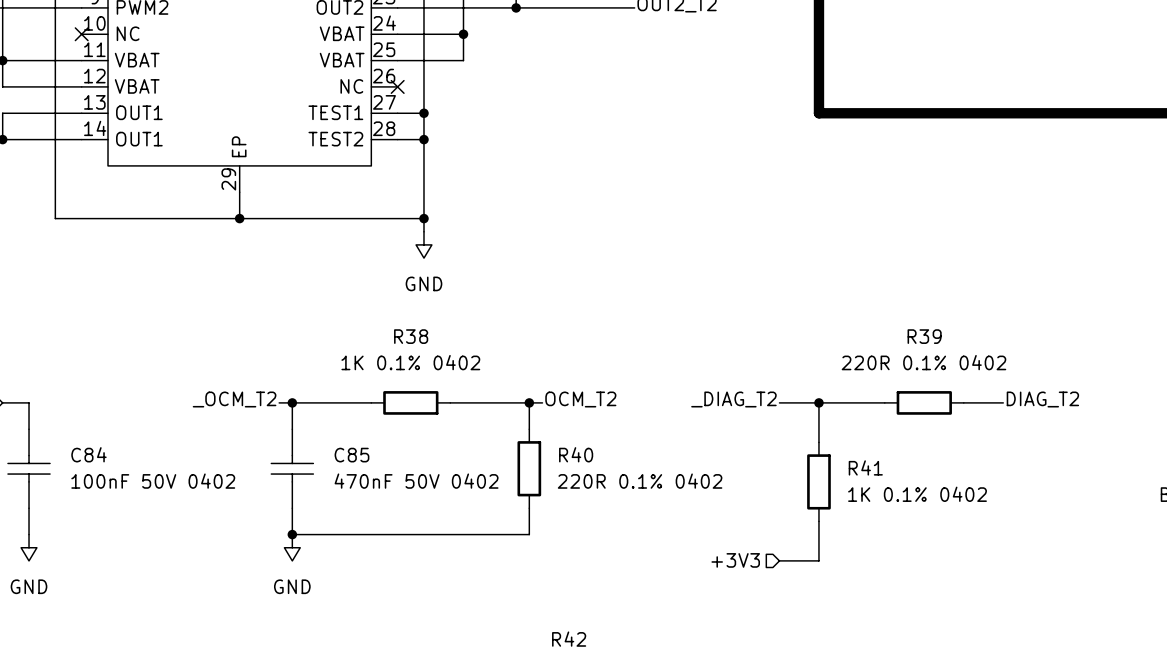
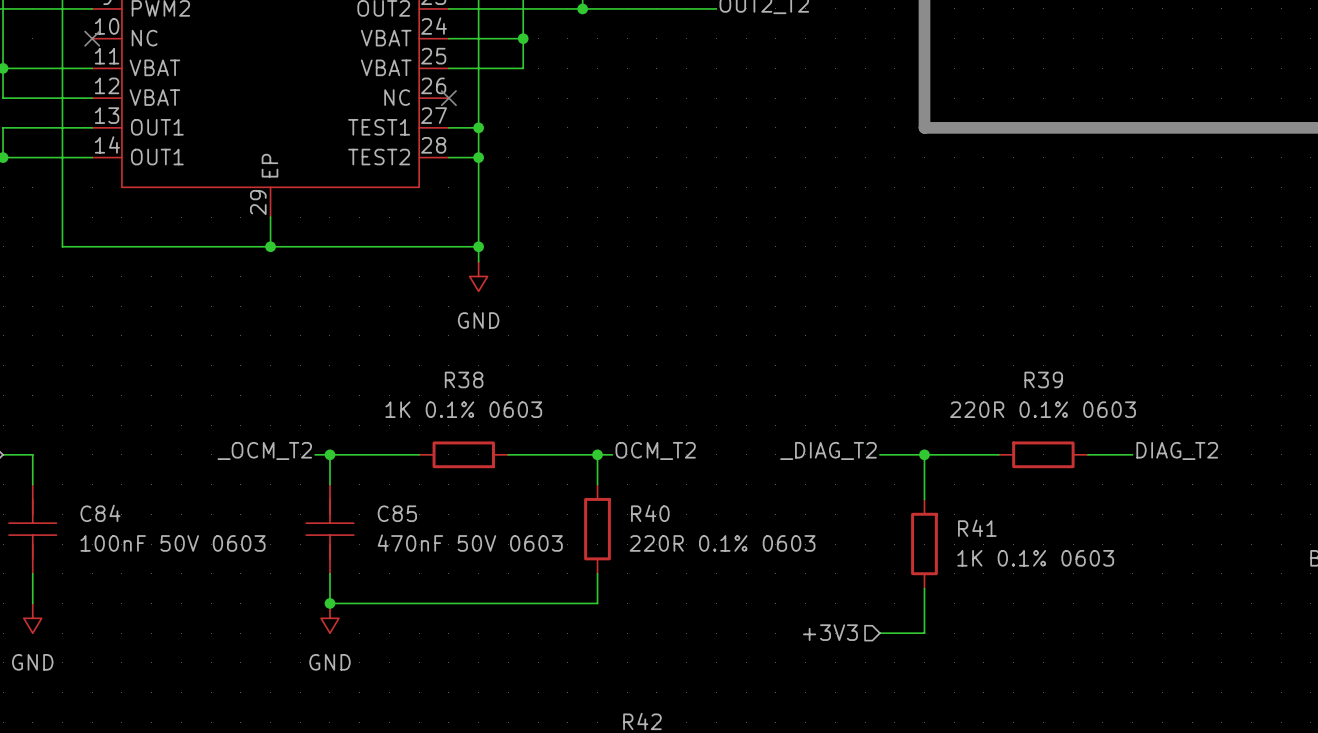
R38 value: 1K 0.1% 0402 (410, 362) -> 1K 0.1% 0603 (463, 409)
R39 value: 220R 0.1% 0402 (923, 362) -> 220R 0.1% 0603 (1043, 409)
C84 symbol: [7, 429, 51, 509] -> [8, 484, 57, 574]
C85 symbol: [271, 429, 314, 509] -> [306, 484, 354, 574]
C84 value: 100nF 50V 0402 (153, 481) -> 100nF 50V 0603 (172, 543)
C85 value: 470nF 50V 0402 (416, 481) -> 470nF 50V 0603 (470, 543)
R40 value: 220R 0.1% 0402 (640, 481) -> 220R 0.1% 0603 (722, 543)
R41 value: 1K 0.1% 0402 (917, 494) -> 1K 0.1% 0603 (1035, 558)

